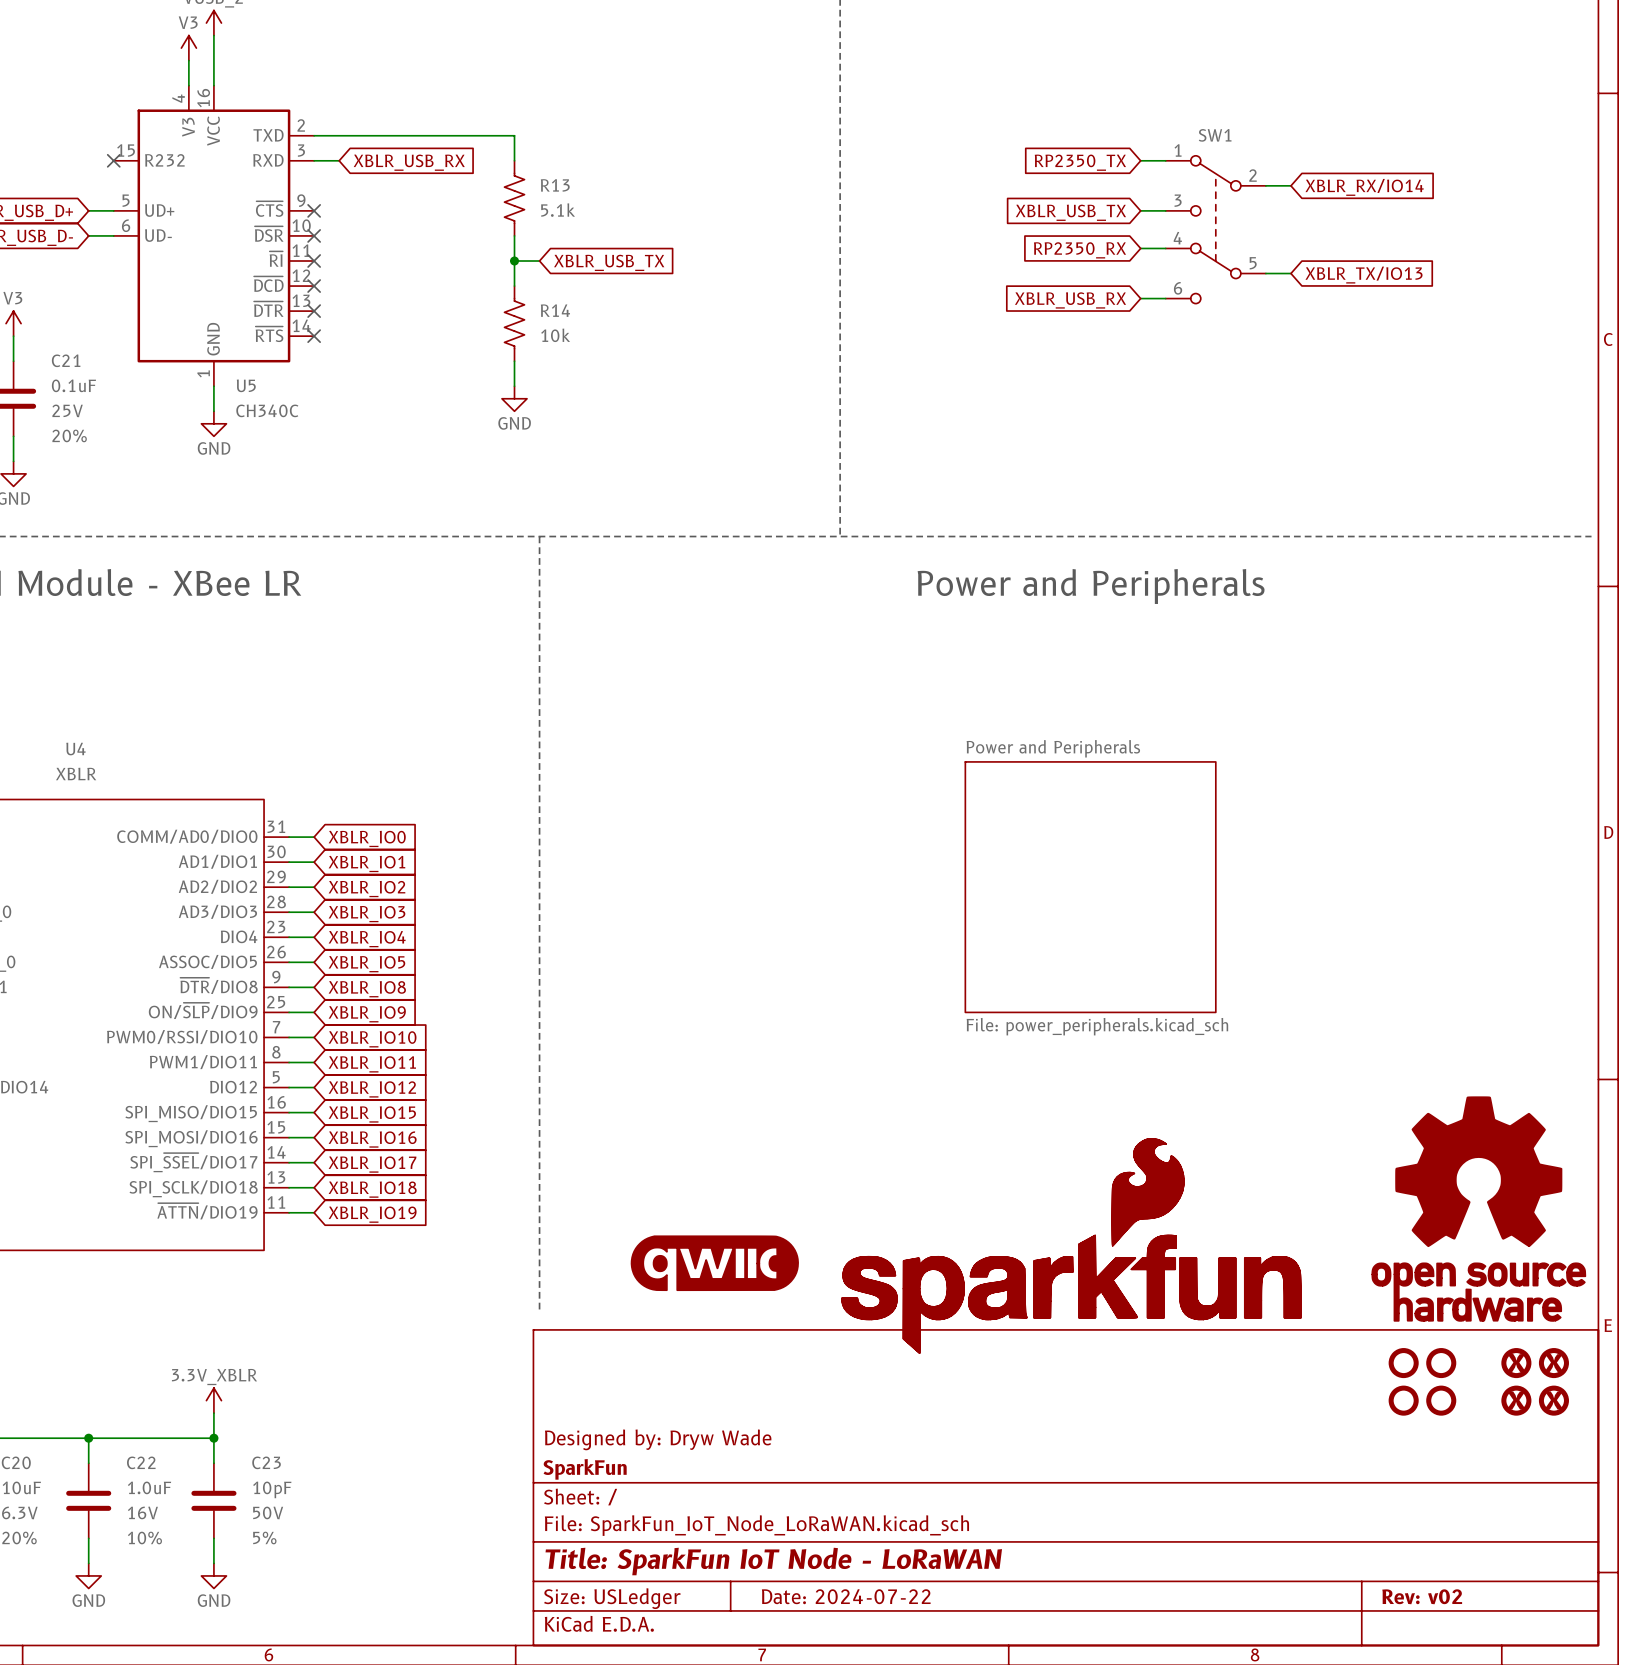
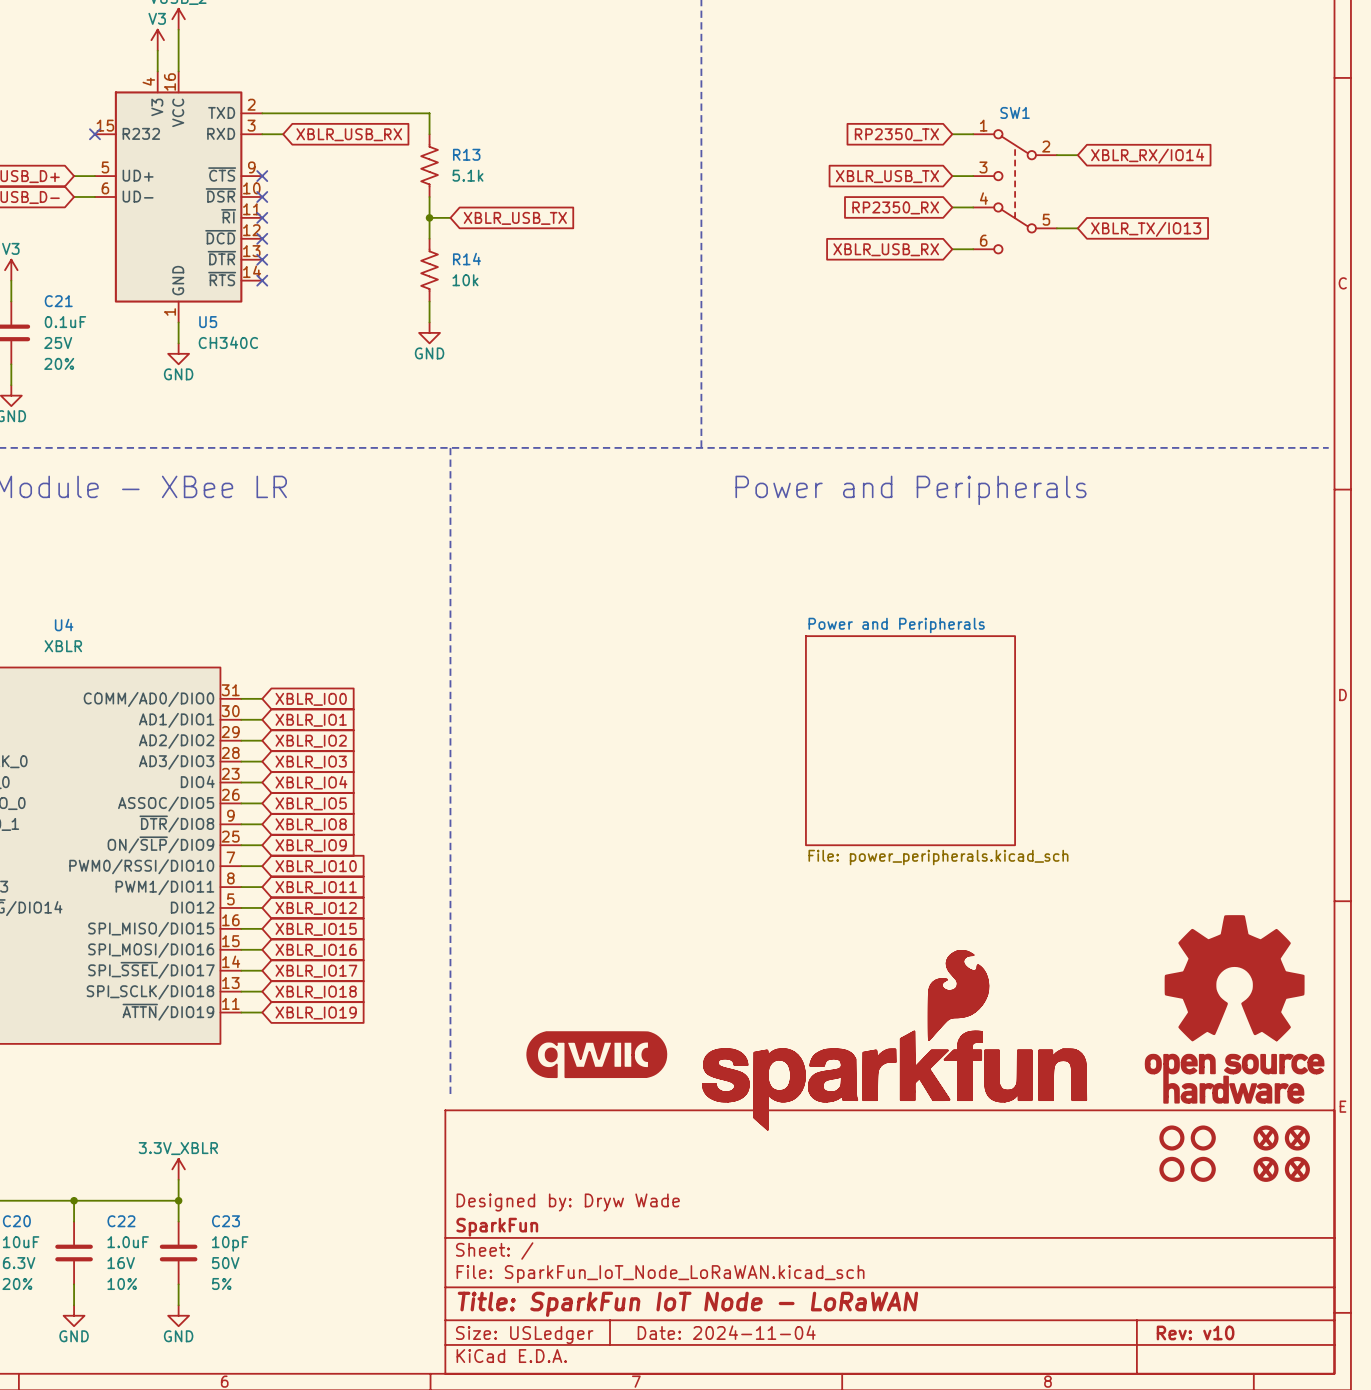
title block: Date: 2024-07-22 (846, 1596) -> Date: 2024-11-04 (726, 1332)
title block: Rev: v02 (1422, 1596) -> Rev: v10 (1195, 1332)

